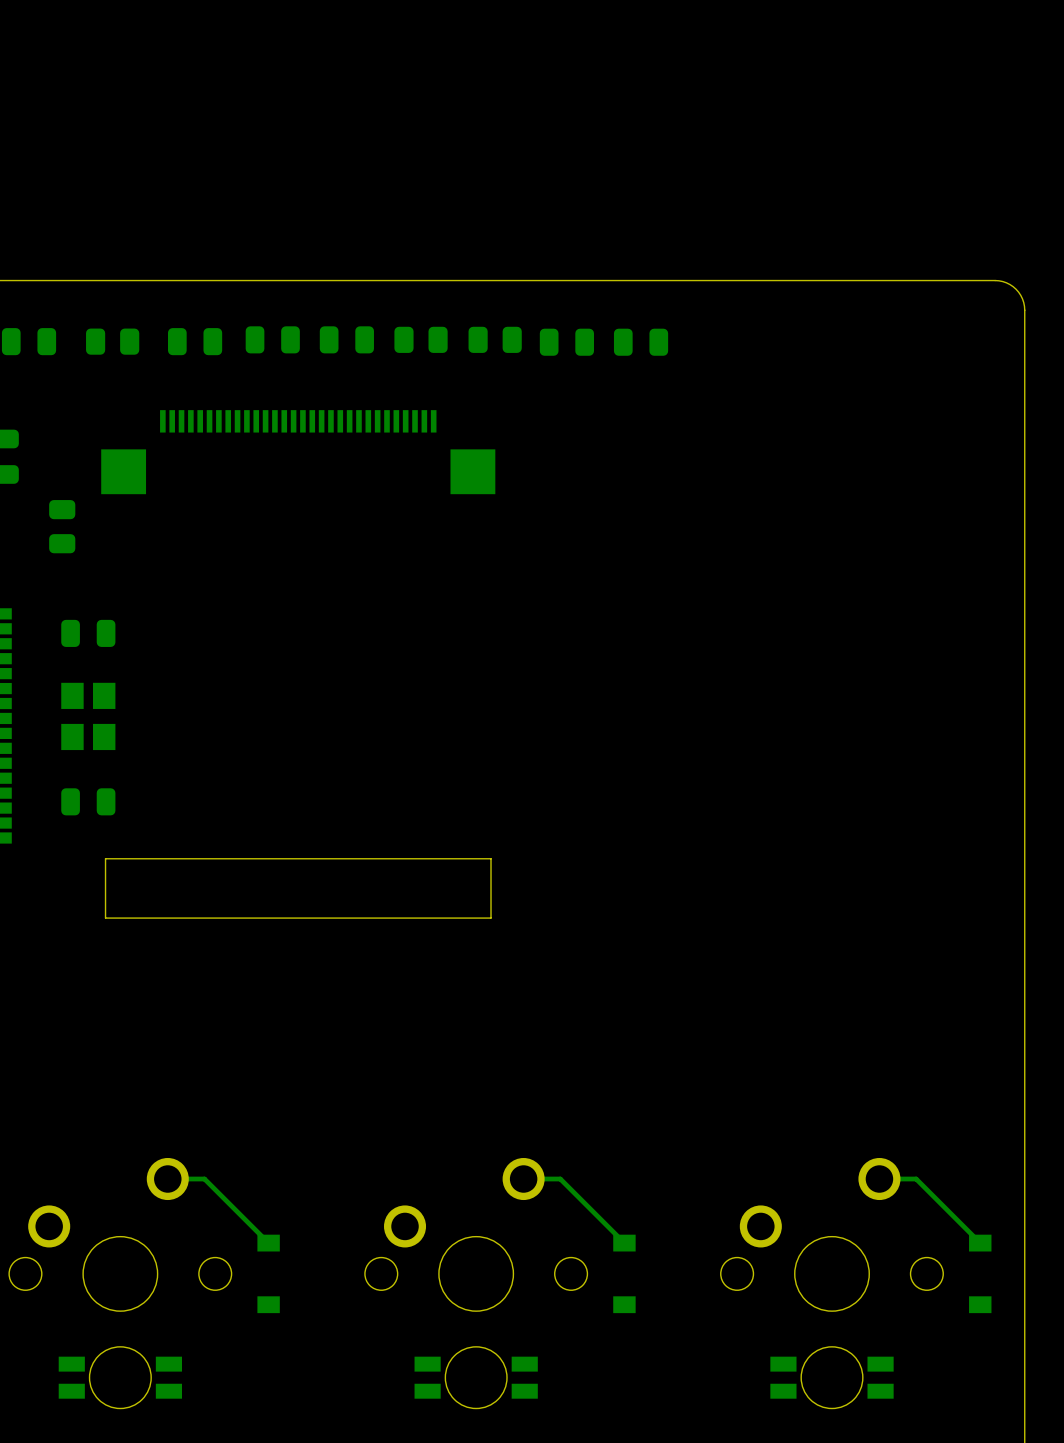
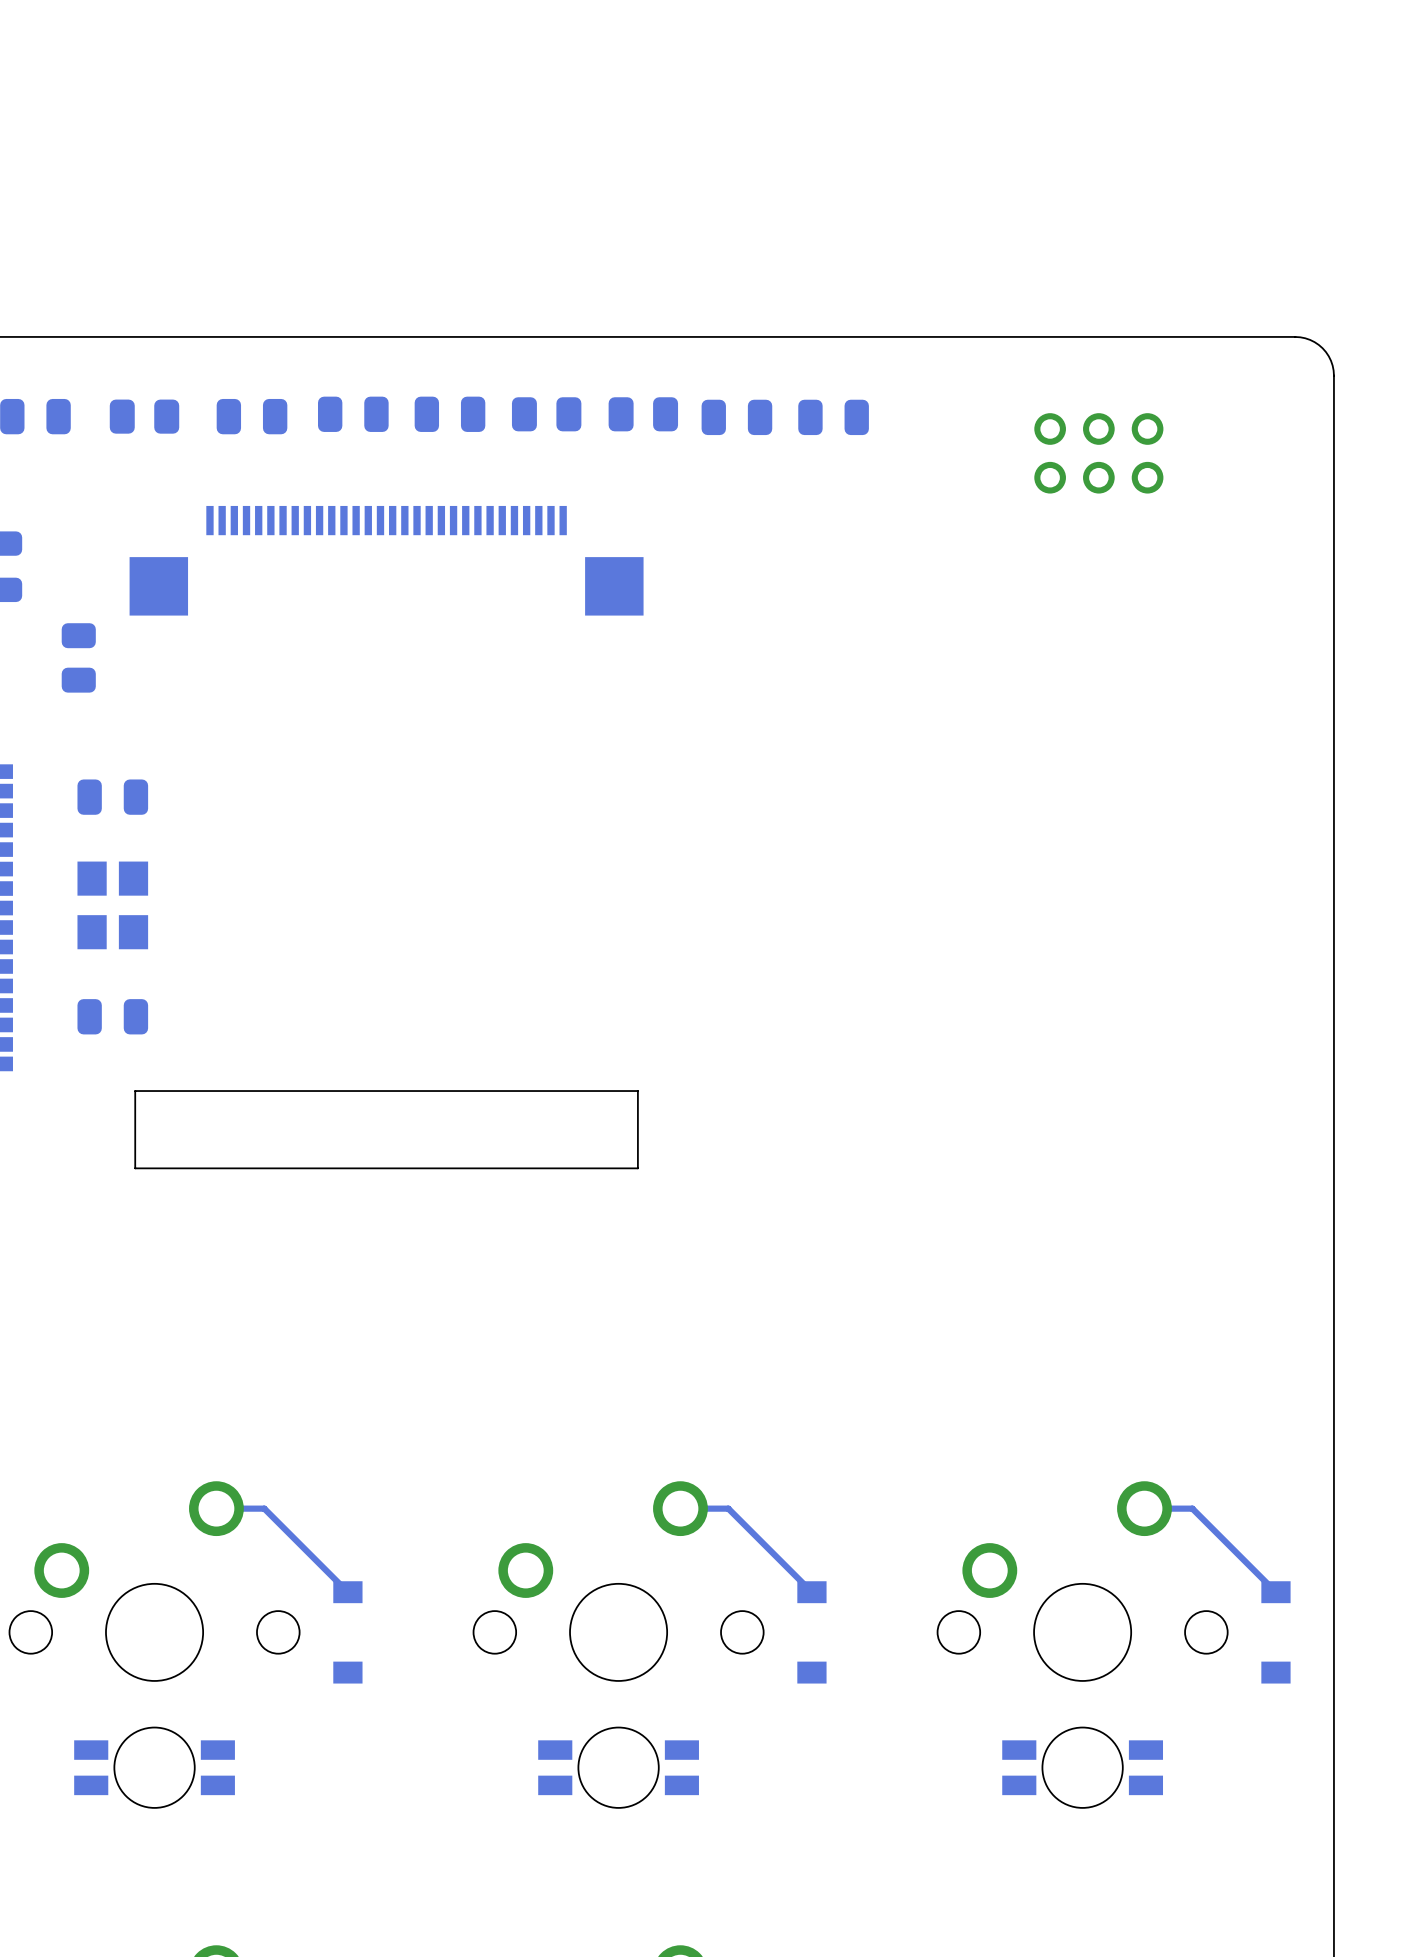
part: none -> (1098, 453)

